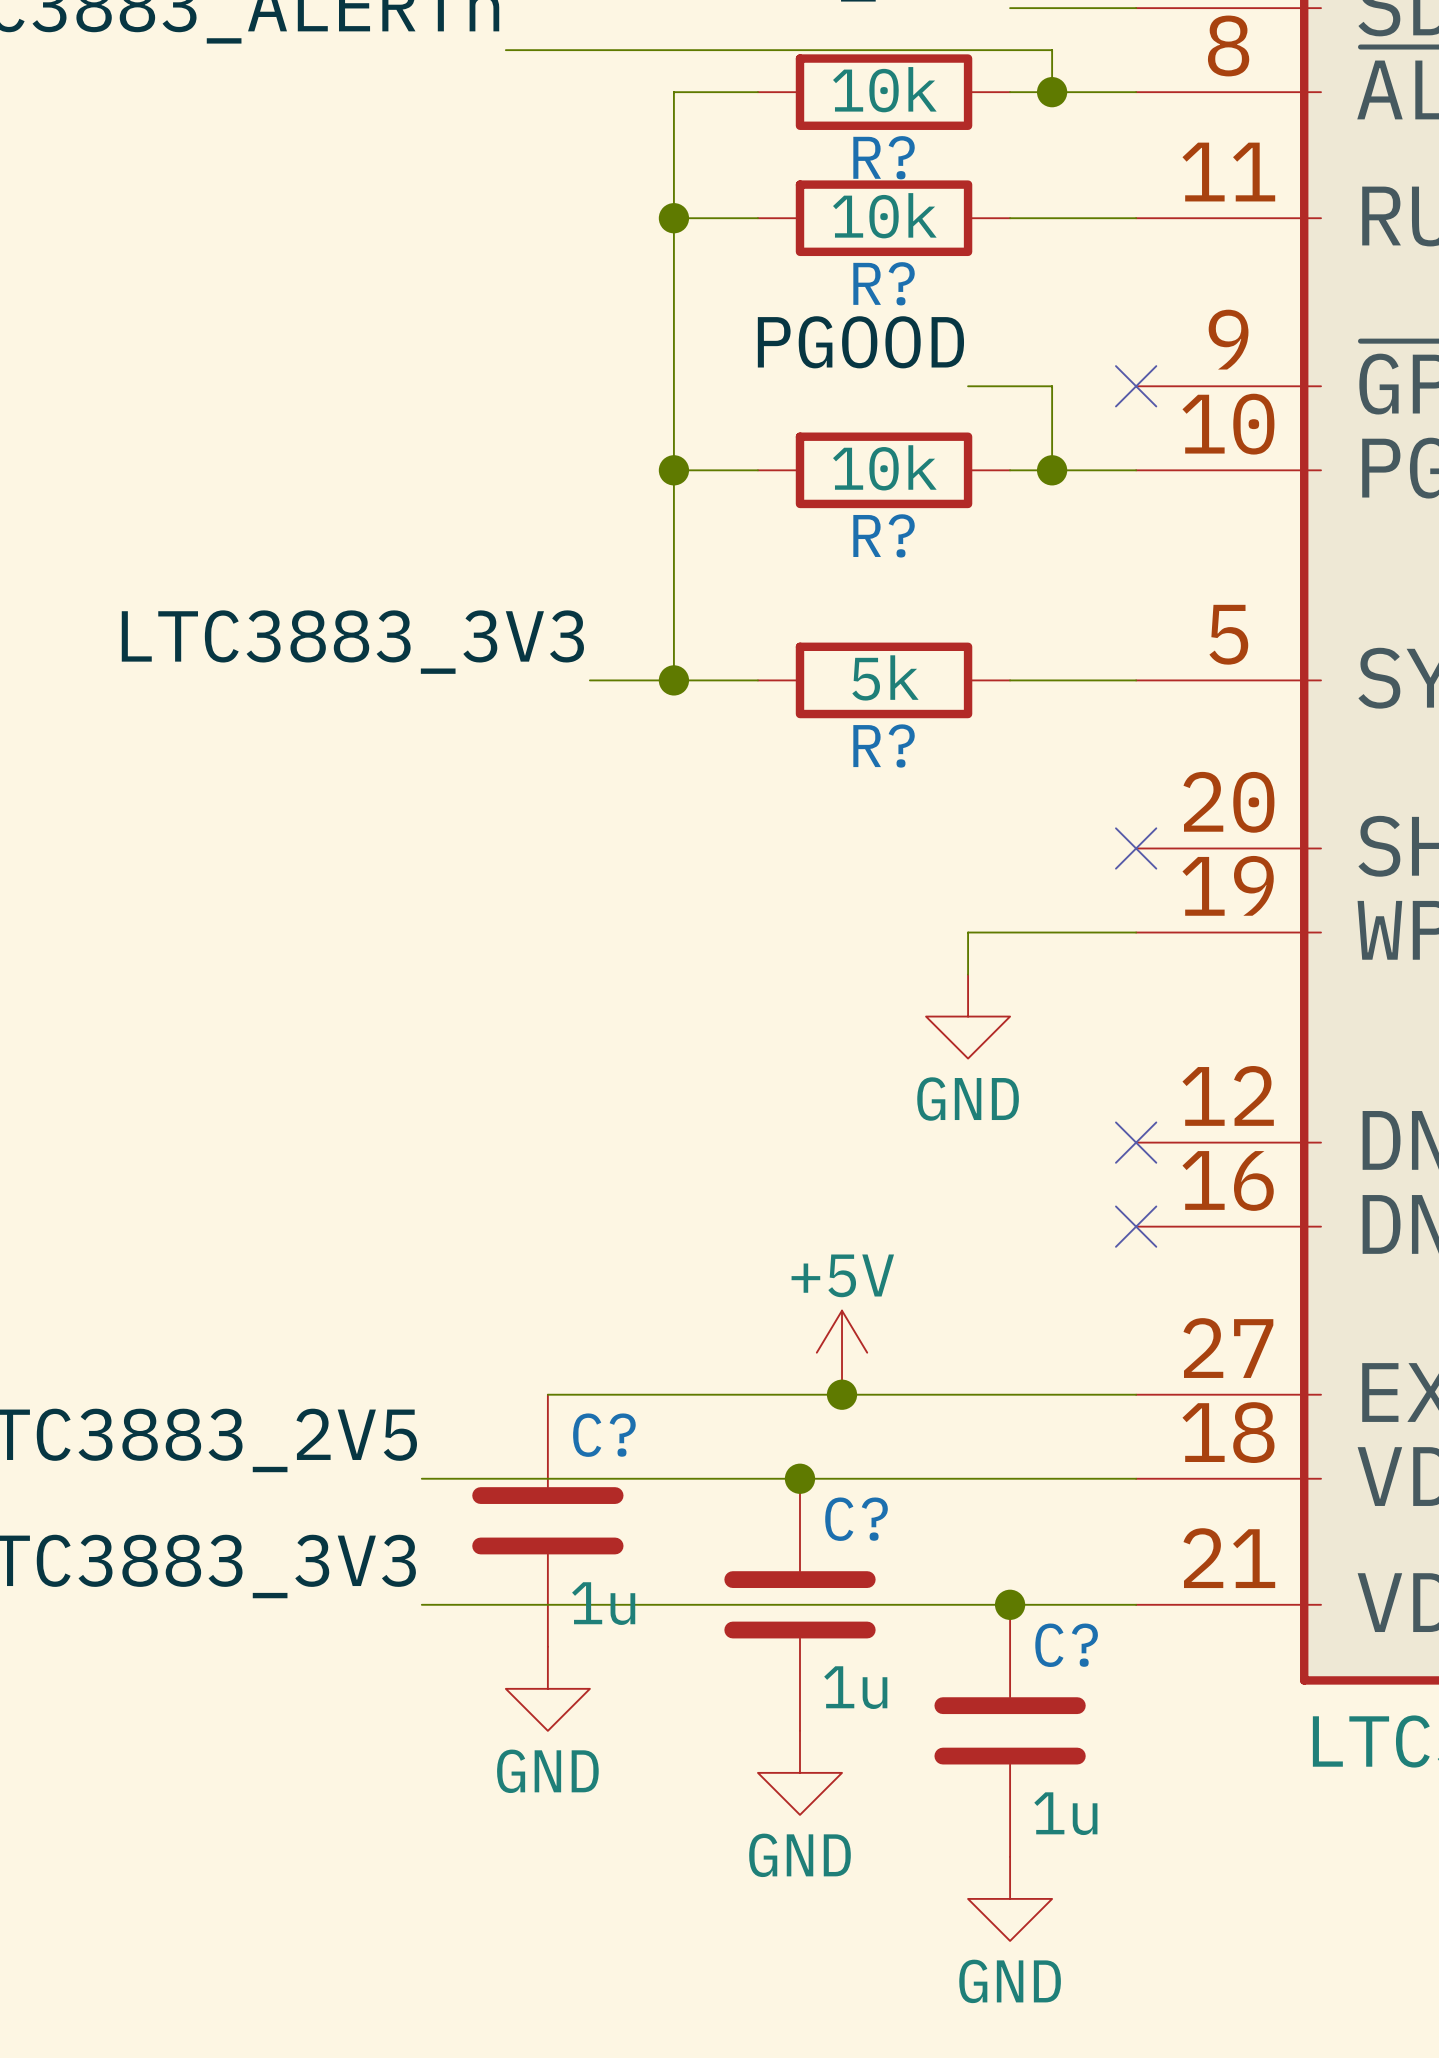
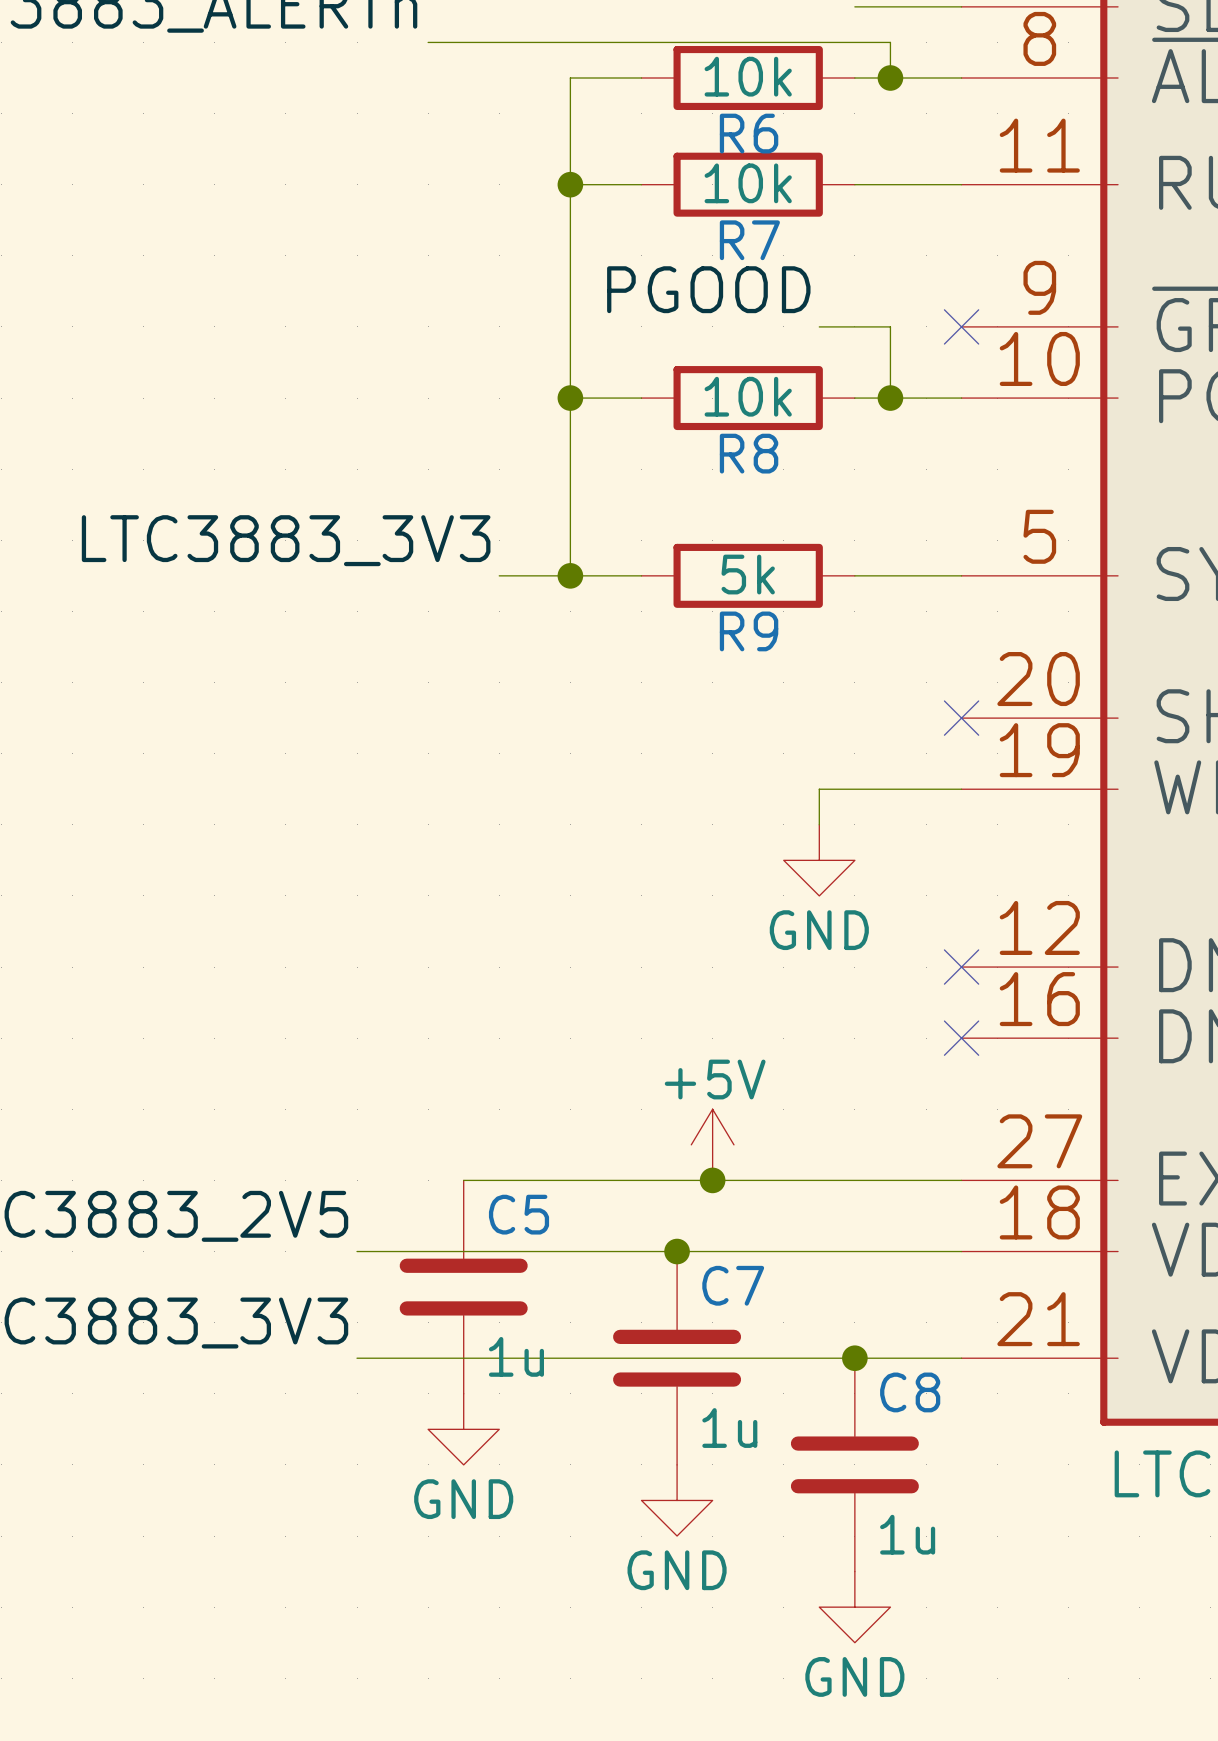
R? name: R? (884, 157) -> R6 (749, 133)
R? name: R? (884, 283) -> R7 (749, 240)
R? name: R? (884, 535) -> R8 (749, 453)
R? name: R? (884, 745) -> R9 (749, 631)
C? name: C? (604, 1435) -> C5 (519, 1214)
C? name: C? (856, 1519) -> C7 (733, 1285)
C? name: C? (1066, 1645) -> C8 (910, 1392)

